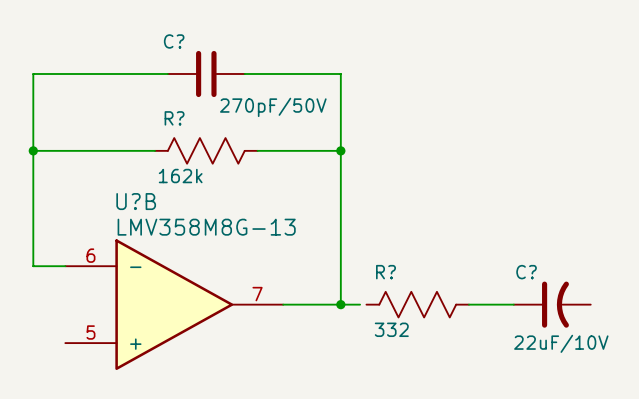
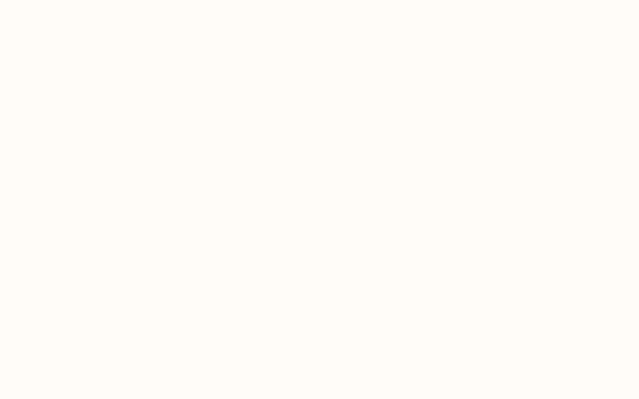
wire: (167, 73) (33, 73) (33, 266) (65, 266) -> none
C?: 270pF/50V (206, 73) -> none
wire: (244, 73) (340, 73) (340, 304) -> none
wire: (33, 150) (155, 150) -> none
junction: (33, 150) -> none
R?: 162k (206, 150) -> none
wire: (257, 150) (340, 150) -> none
junction: (340, 150) -> none
U?B: LMV358M8G-13 (174, 304) -> none
wire: (283, 304) (360, 304) -> none
junction: (340, 304) -> none
R?: 332 (417, 304) -> none
wire: (468, 304) (513, 304) -> none
C?: 22uF/10V (552, 304) -> none

